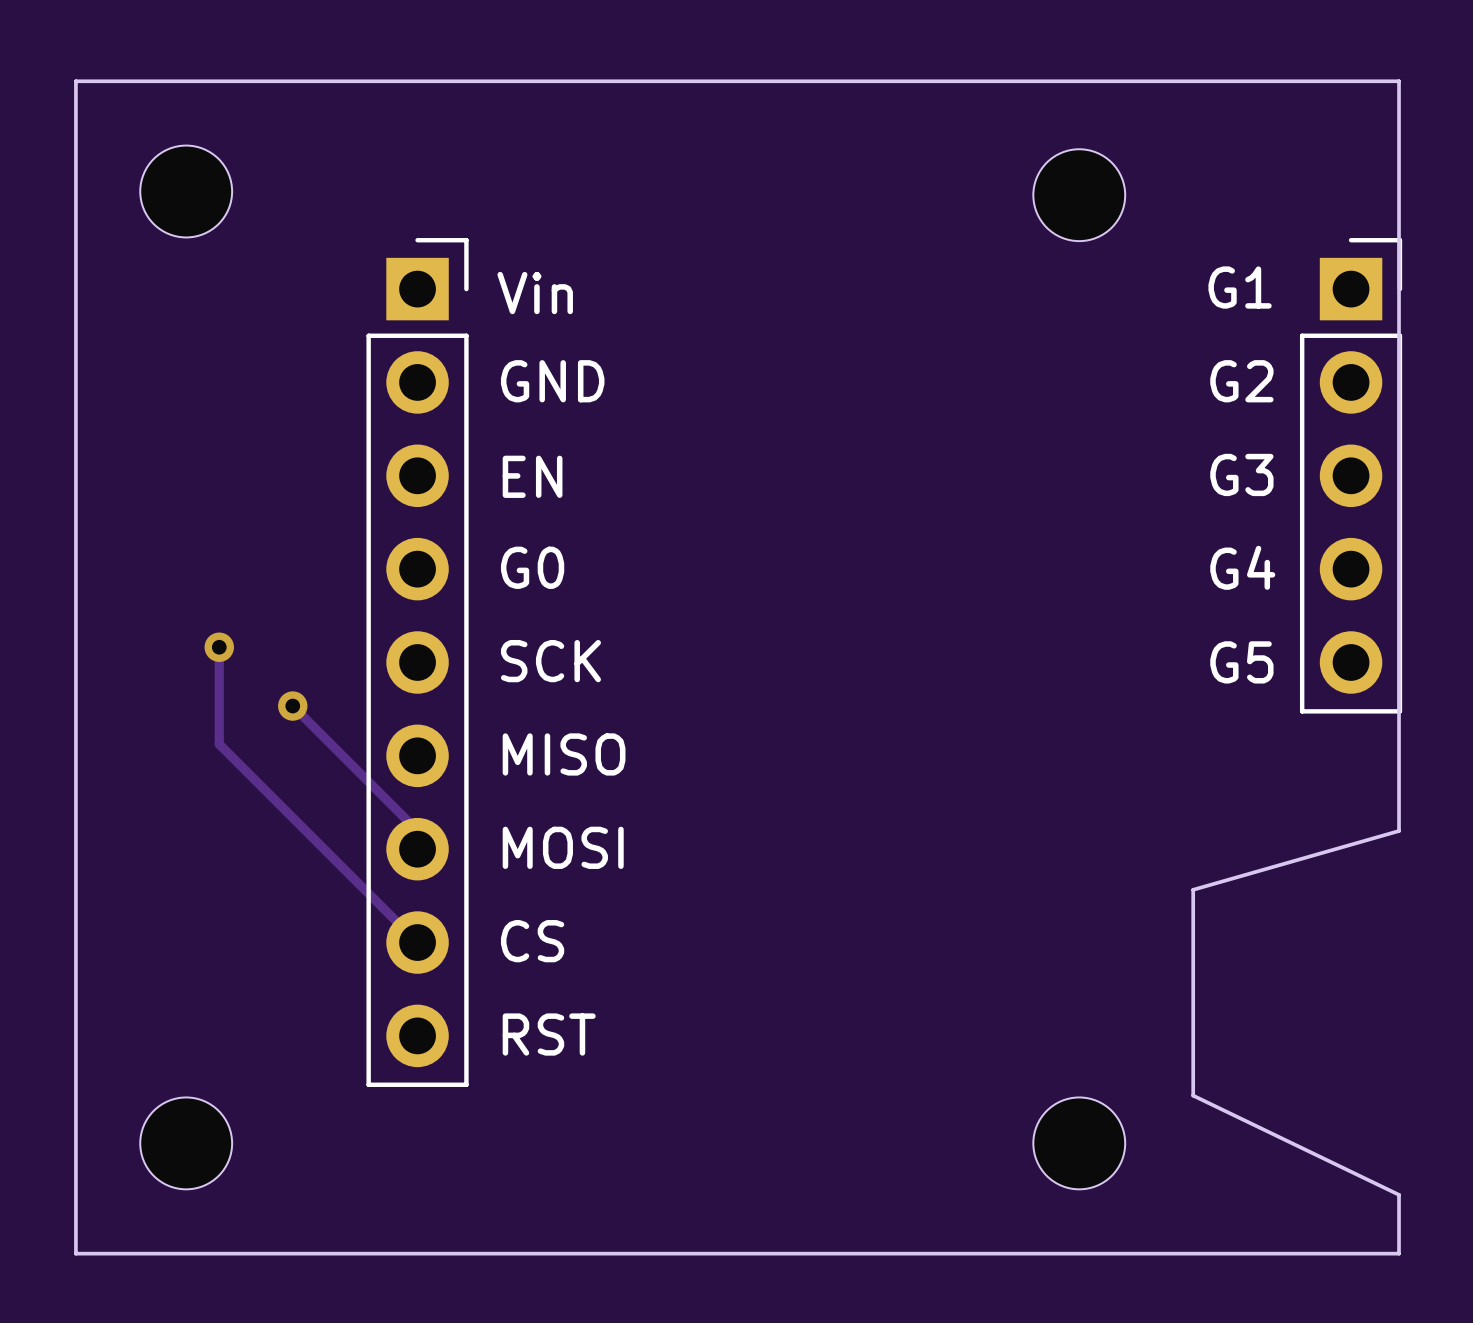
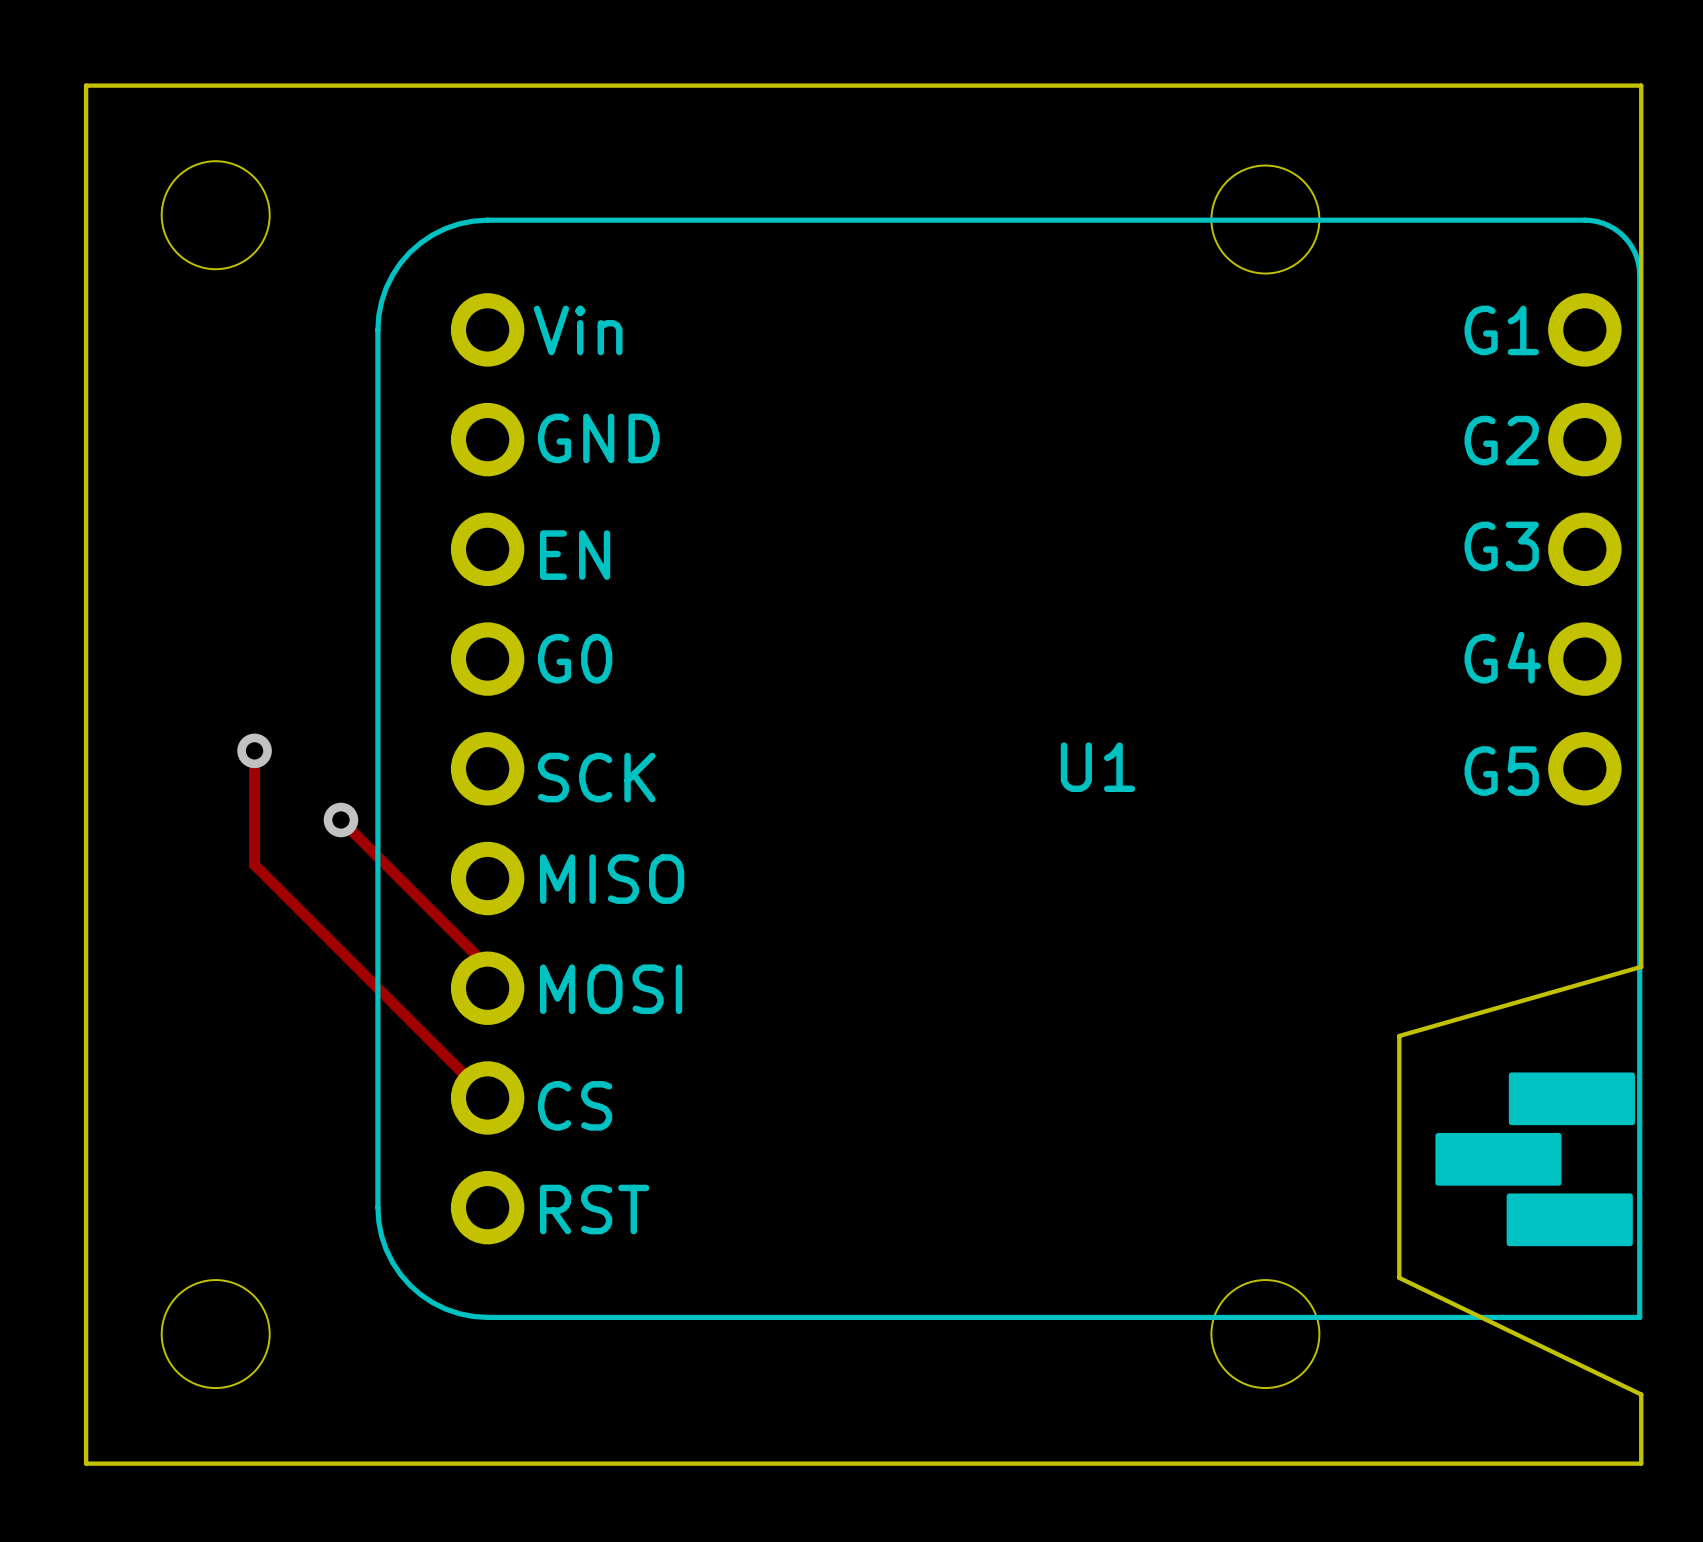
text: G1 (1240, 287) -> none
text: Vin (535, 293) -> none
text: GND (552, 381) -> none
text: G2 (1241, 381) -> none
text: G3 (1241, 474) -> none
part: (1351, 475) -> none
text: EN (532, 476) -> none
text: G0 (532, 567) -> none
text: G4 (1242, 567) -> none
text: SCK (550, 661) -> none
part: (417, 662) -> none
U1: none -> (1008, 768)
text: G5 (1241, 662) -> none
text: MISO (564, 754) -> none
text: MOSI (563, 847) -> none
text: CS (532, 941) -> none
text: RST (549, 1034) -> none

